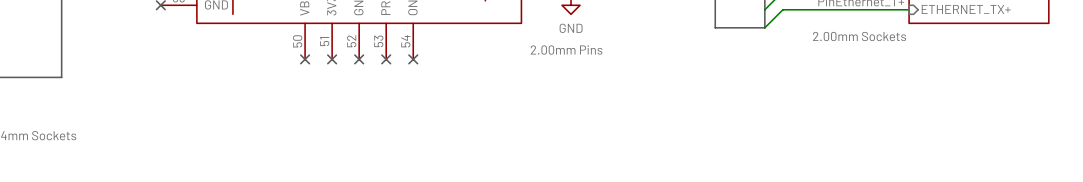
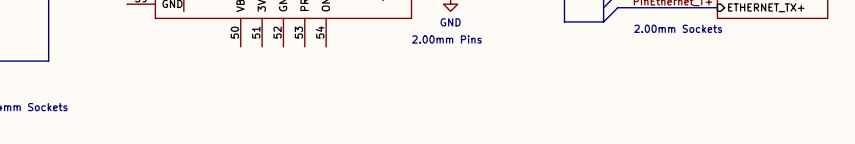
no-connect mark: (160, 5) -> none
no-connect mark: (305, 59) -> none
no-connect mark: (332, 59) -> none
no-connect mark: (359, 59) -> none
no-connect mark: (386, 59) -> none
no-connect mark: (413, 59) -> none

